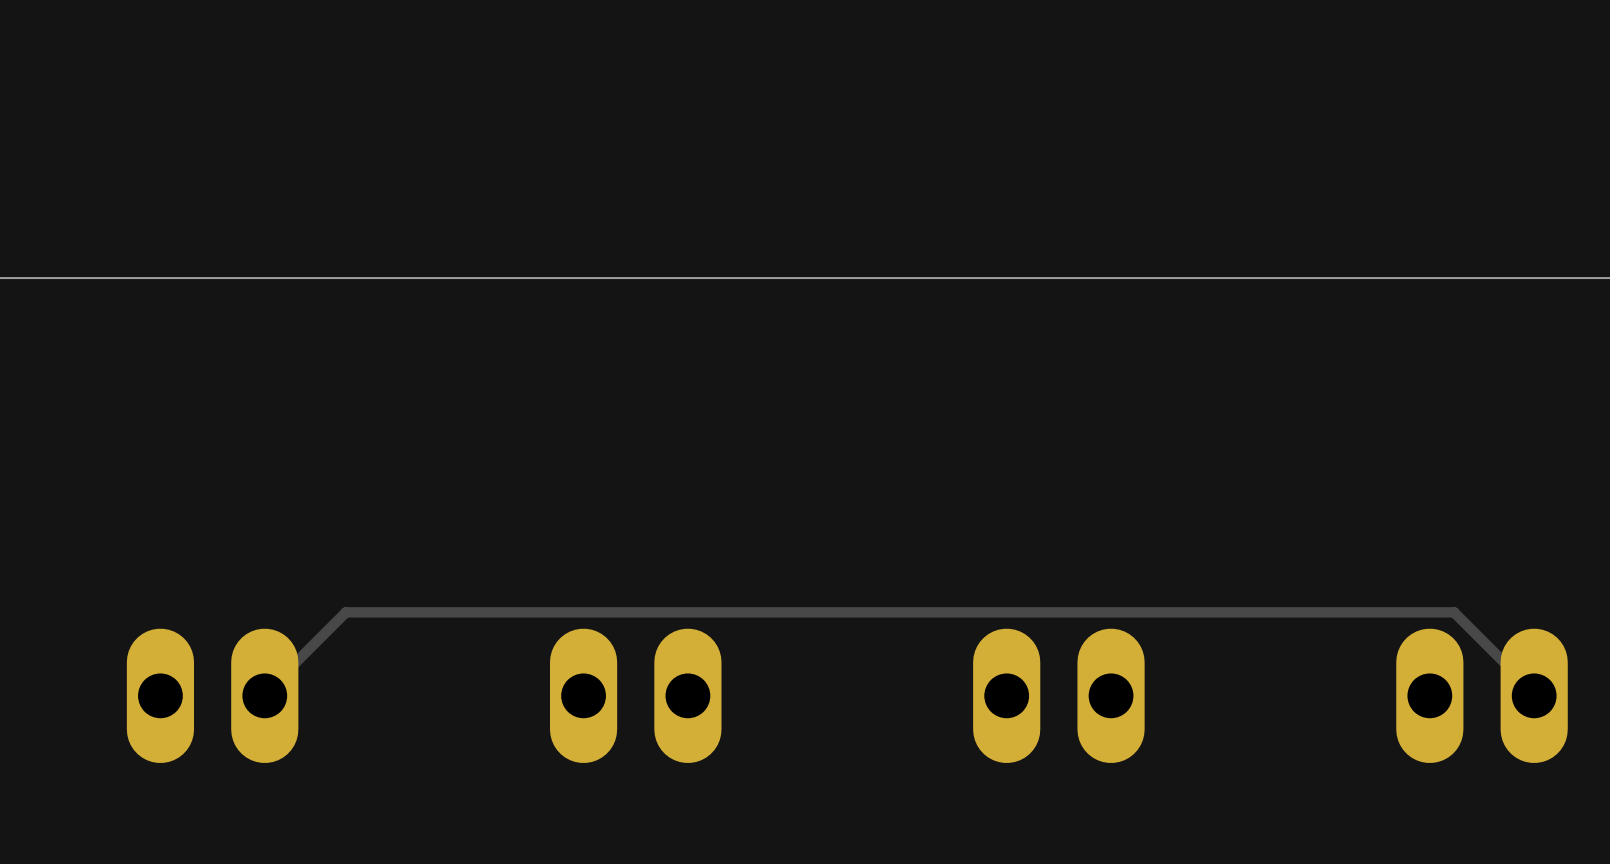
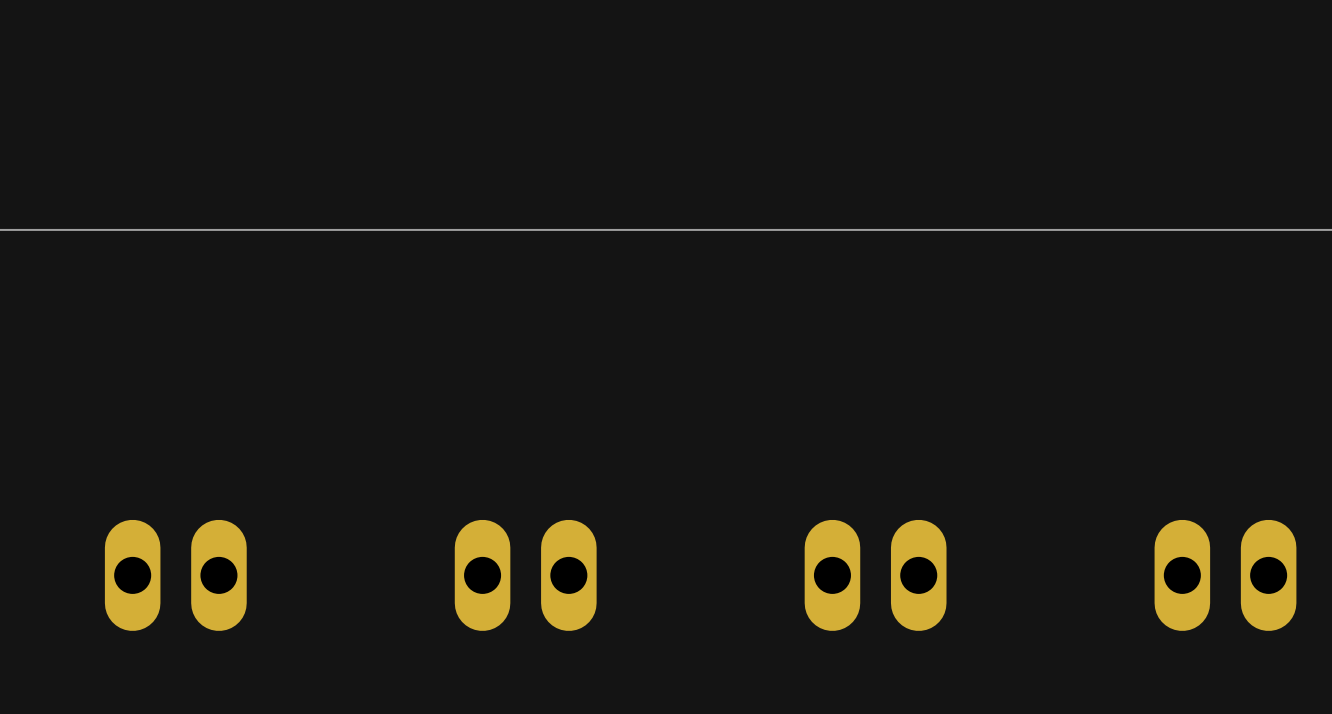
track: (1534, 695) (1529, 687) (1454, 612) (345, 612) (264, 695) -> none

